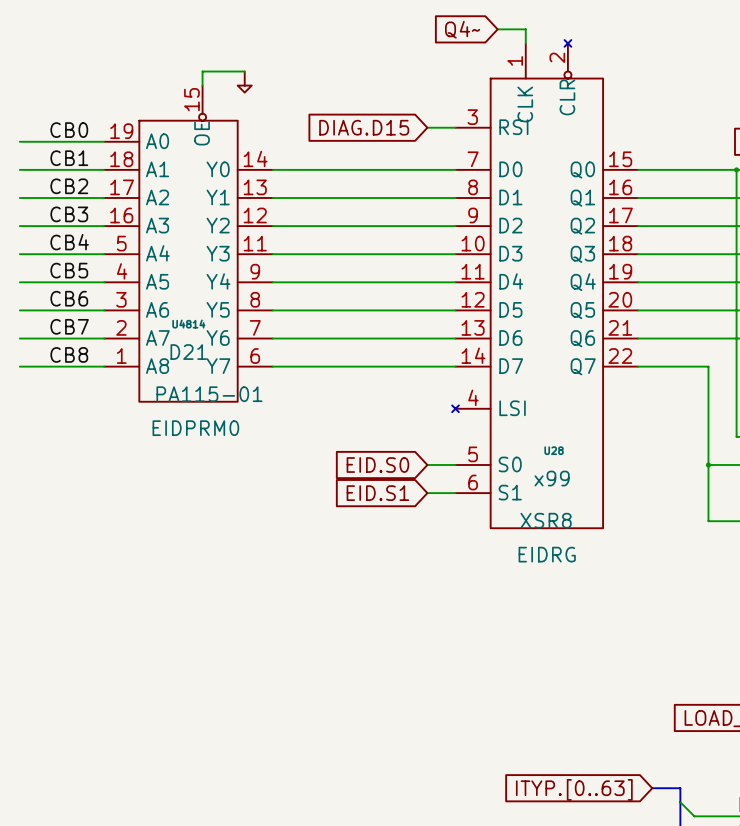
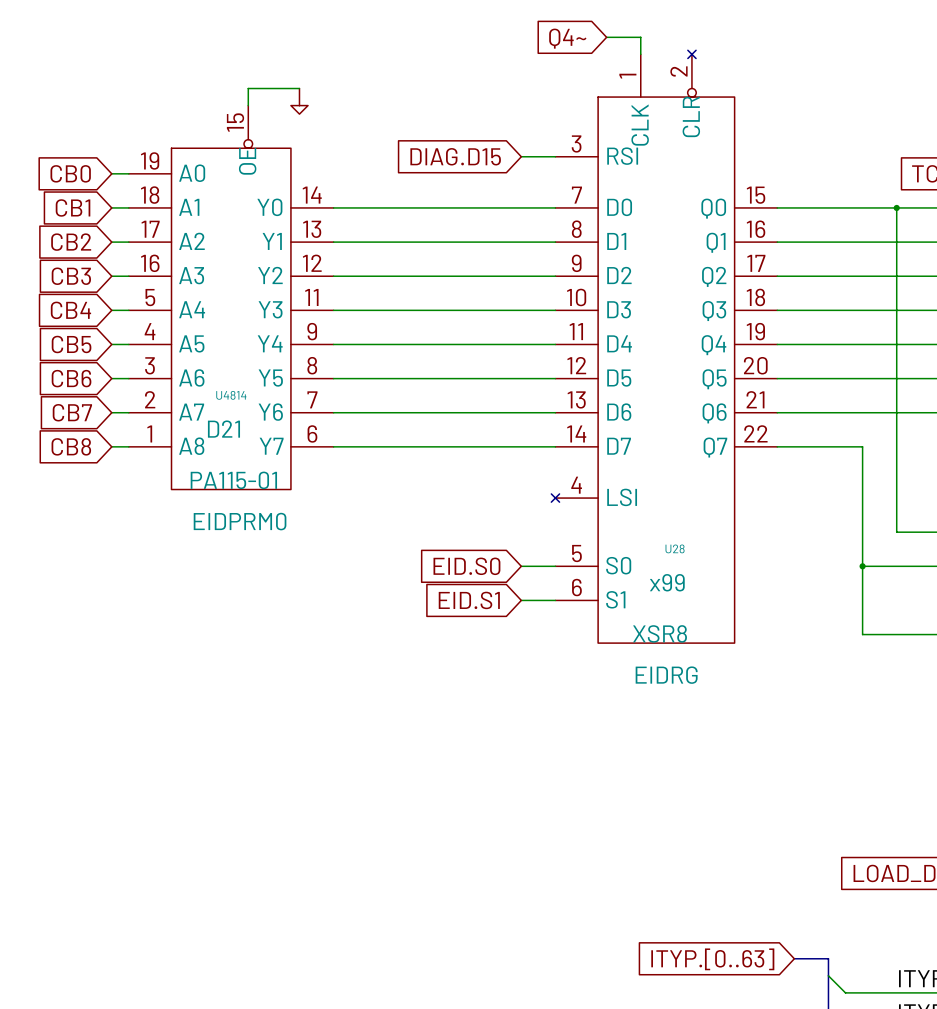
label: CB0 (69, 130) -> none
wire: (19, 141) (90, 141) -> none
global label: none -> CB0 (70, 173)
label: CB1 (69, 158) -> none
wire: (19, 169) (90, 169) -> none
global label: none -> CB1 (73, 207)
label: CB2 (69, 186) -> none
wire: (19, 197) (90, 197) -> none
global label: none -> CB2 (71, 242)
label: CB3 (69, 214) -> none
wire: (19, 226) (90, 226) -> none
global label: none -> CB3 (71, 276)
label: CB4 (69, 242) -> none
global label: none -> CB4 (70, 310)
wire: (19, 254) (90, 254) -> none
label: CB5 (69, 270) -> none
wire: (19, 282) (90, 282) -> none
global label: none -> CB5 (71, 344)
label: CB6 (69, 298) -> none
wire: (19, 310) (90, 310) -> none
global label: none -> CB6 (71, 378)
label: CB7 (69, 326) -> none
wire: (19, 338) (90, 338) -> none
global label: none -> CB7 (72, 412)
label: CB8 (69, 354) -> none
wire: (19, 366) (90, 366) -> none
global label: none -> CB8 (71, 446)

